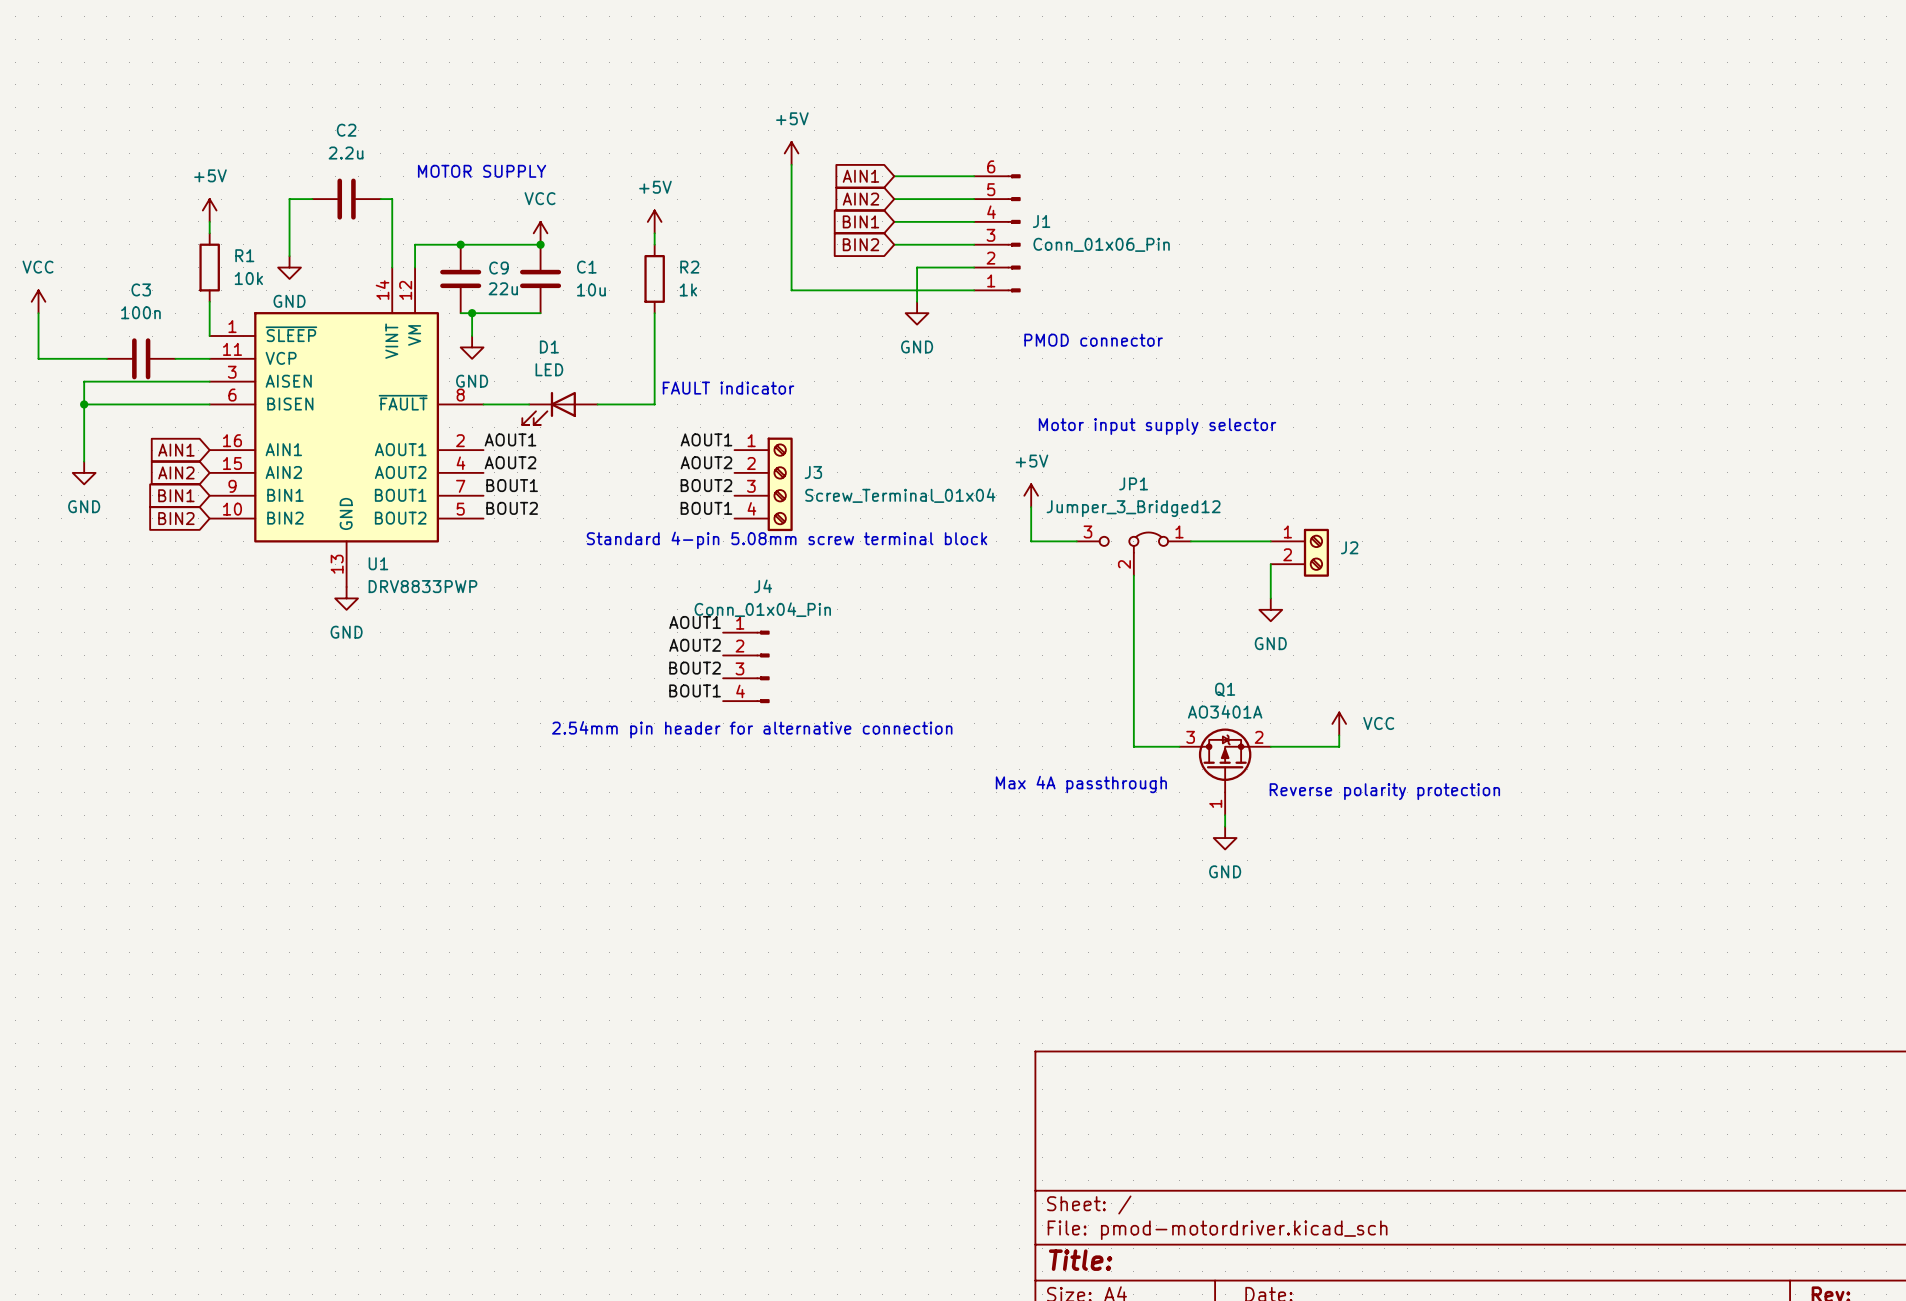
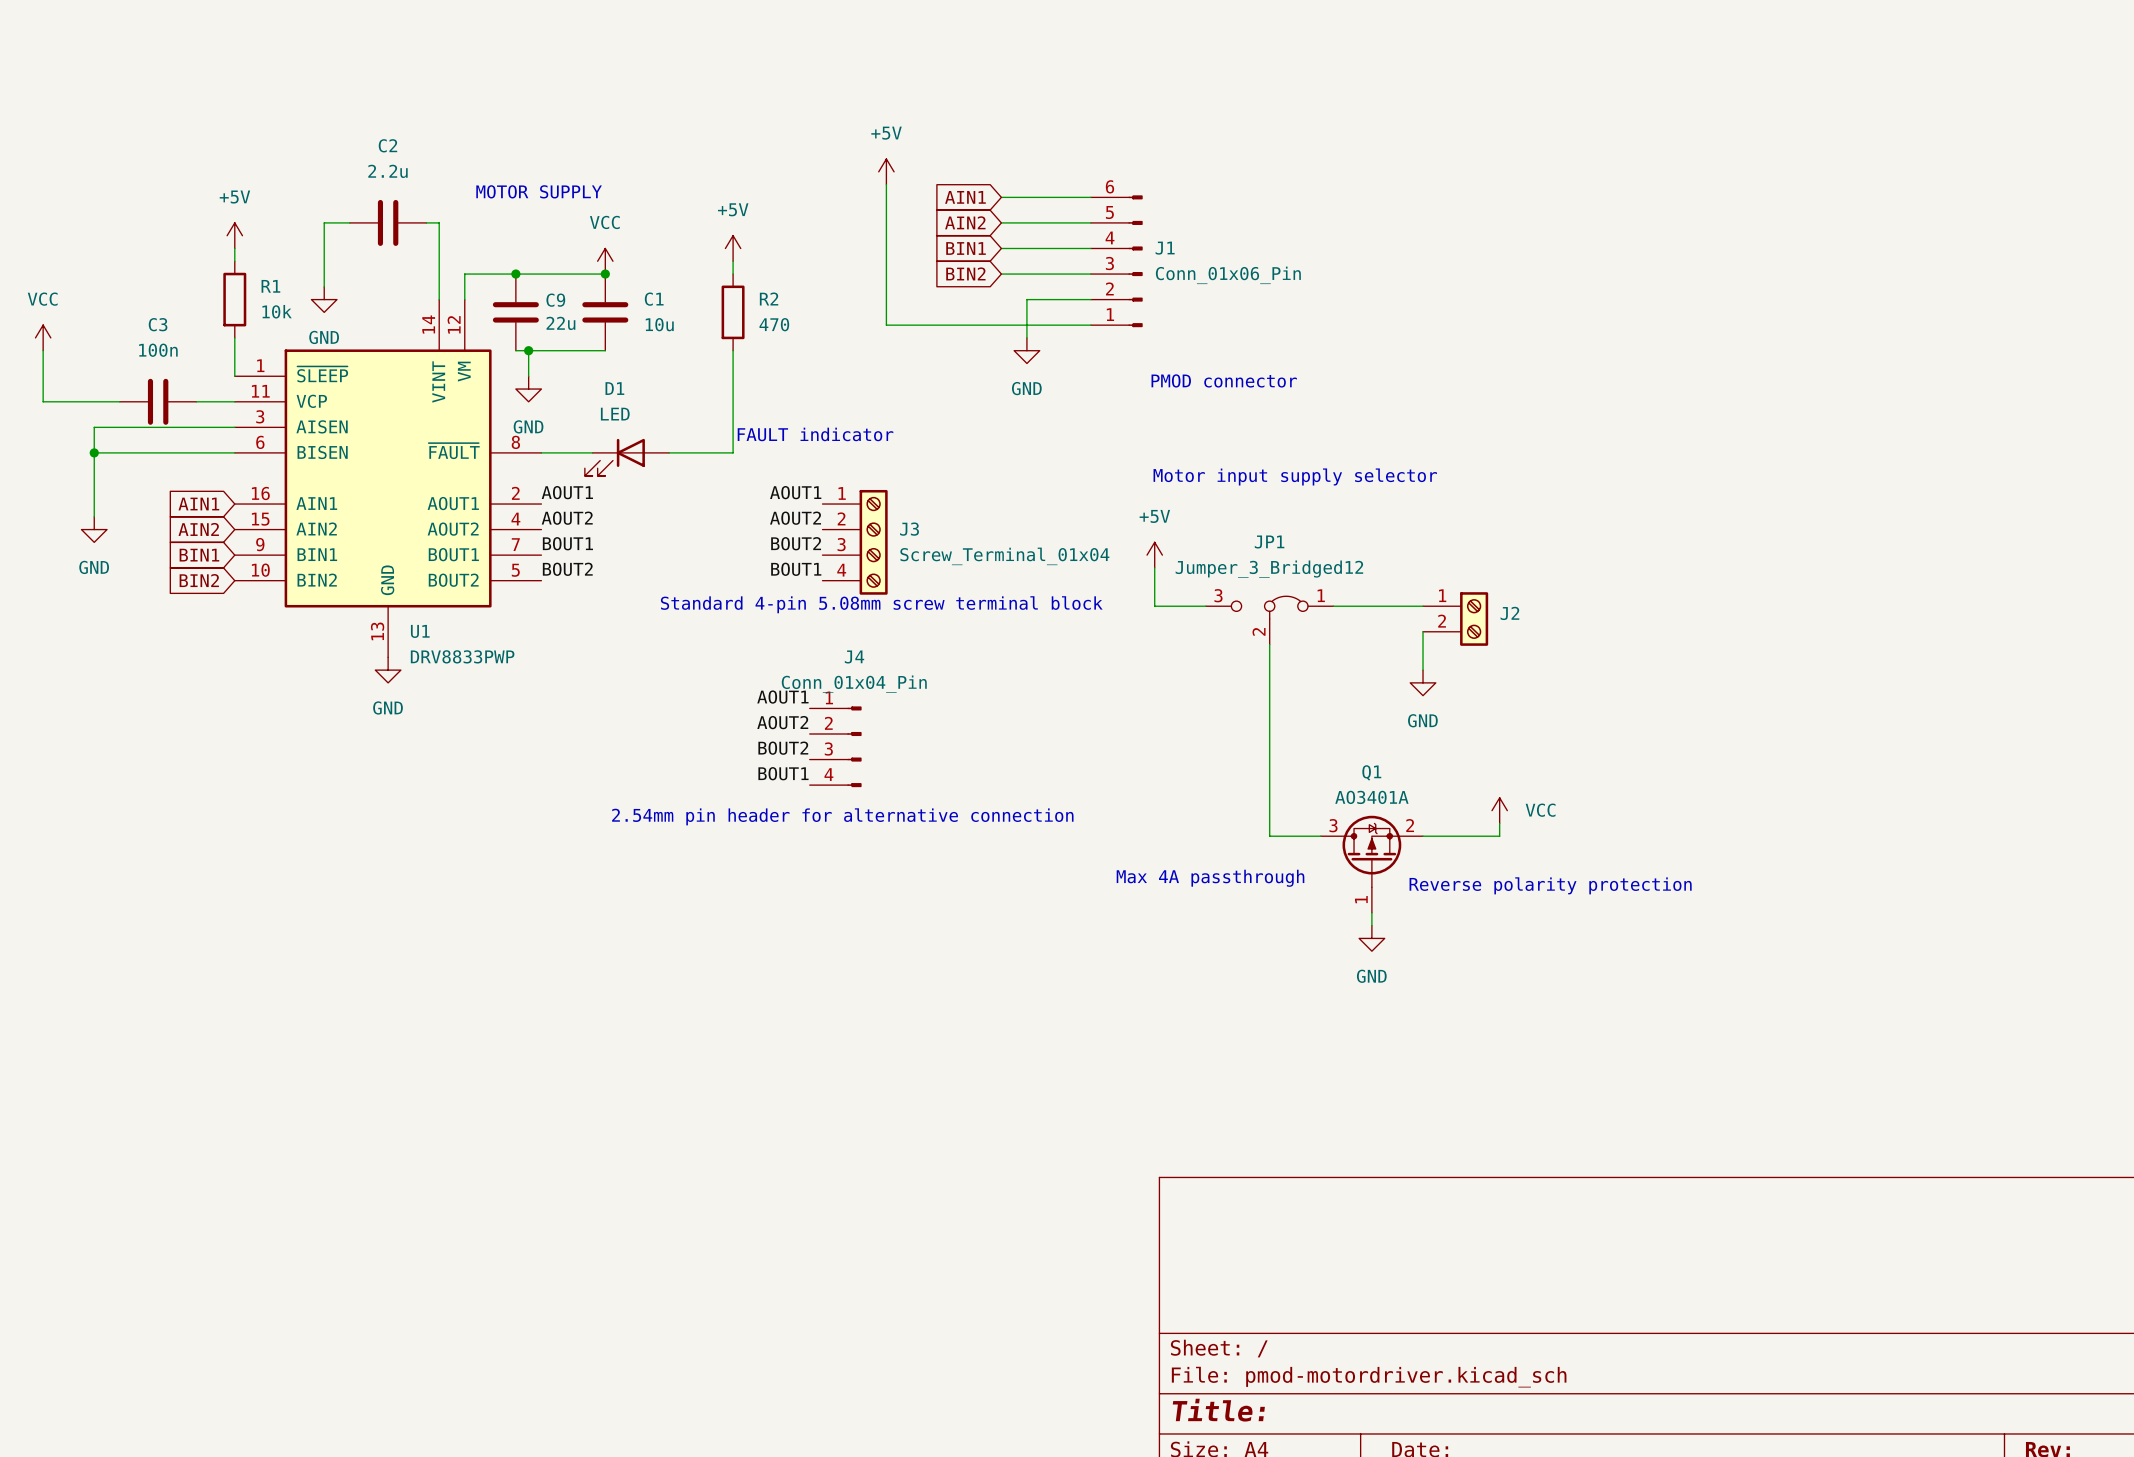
R2 value: 1k (688, 289) -> 470 (774, 324)

